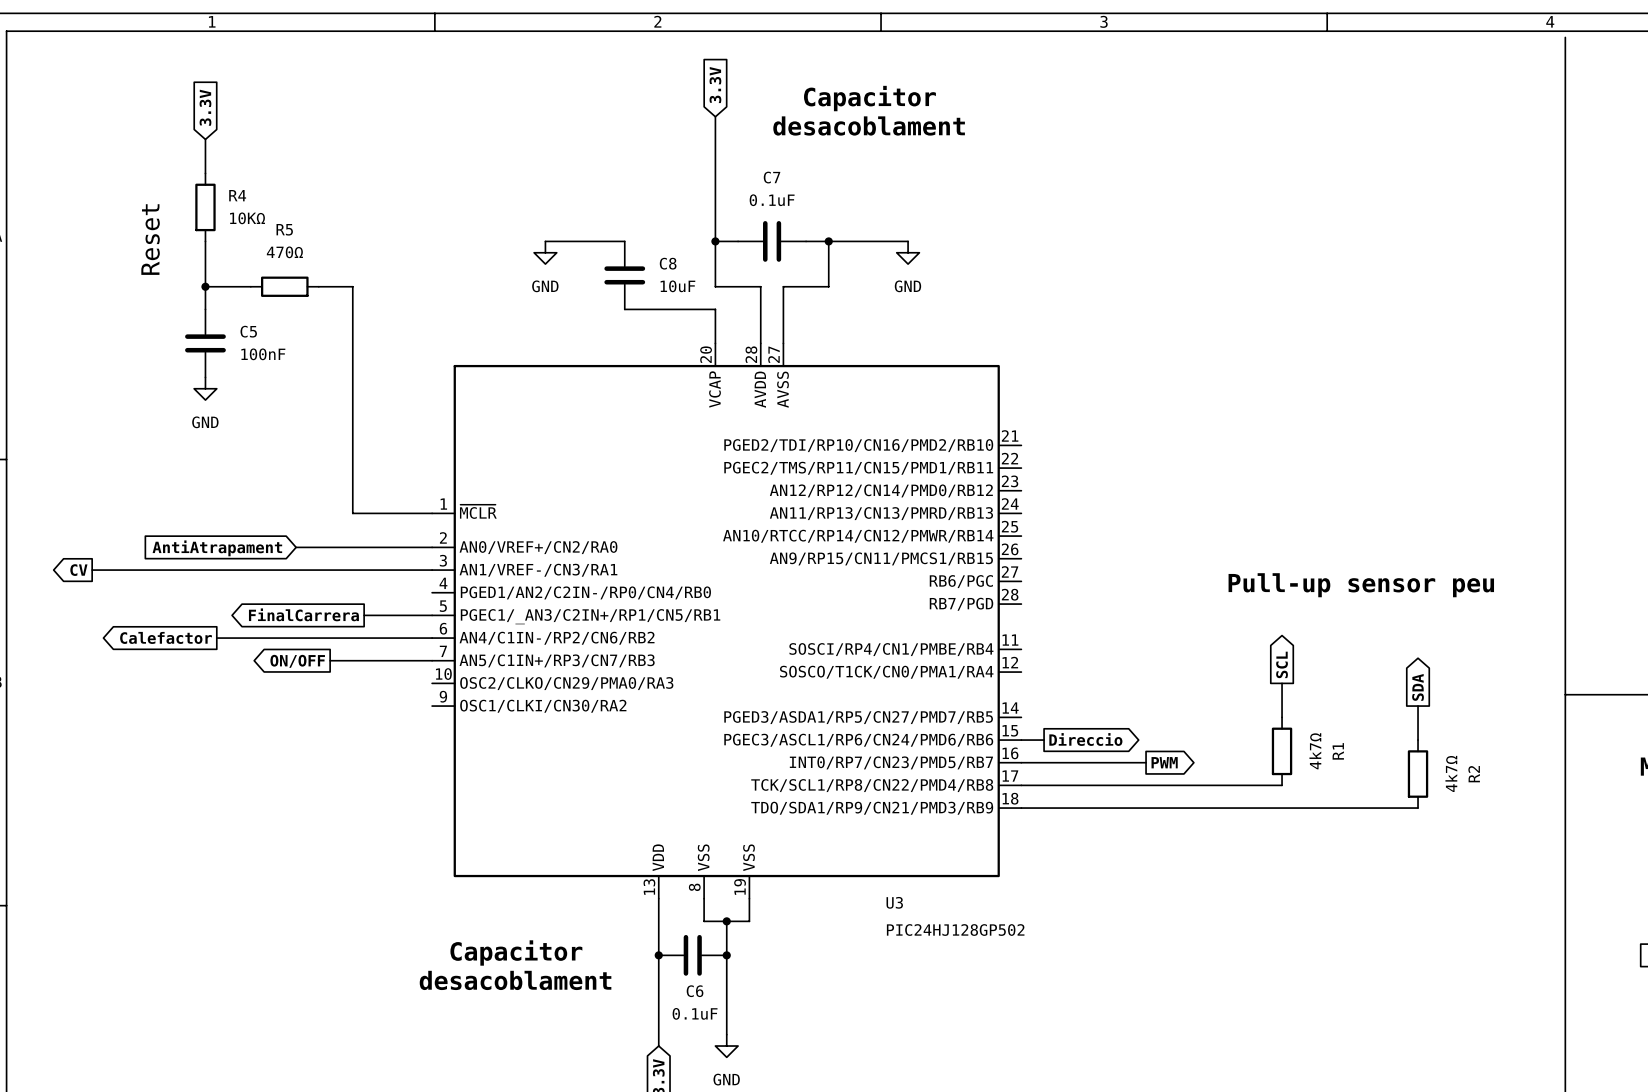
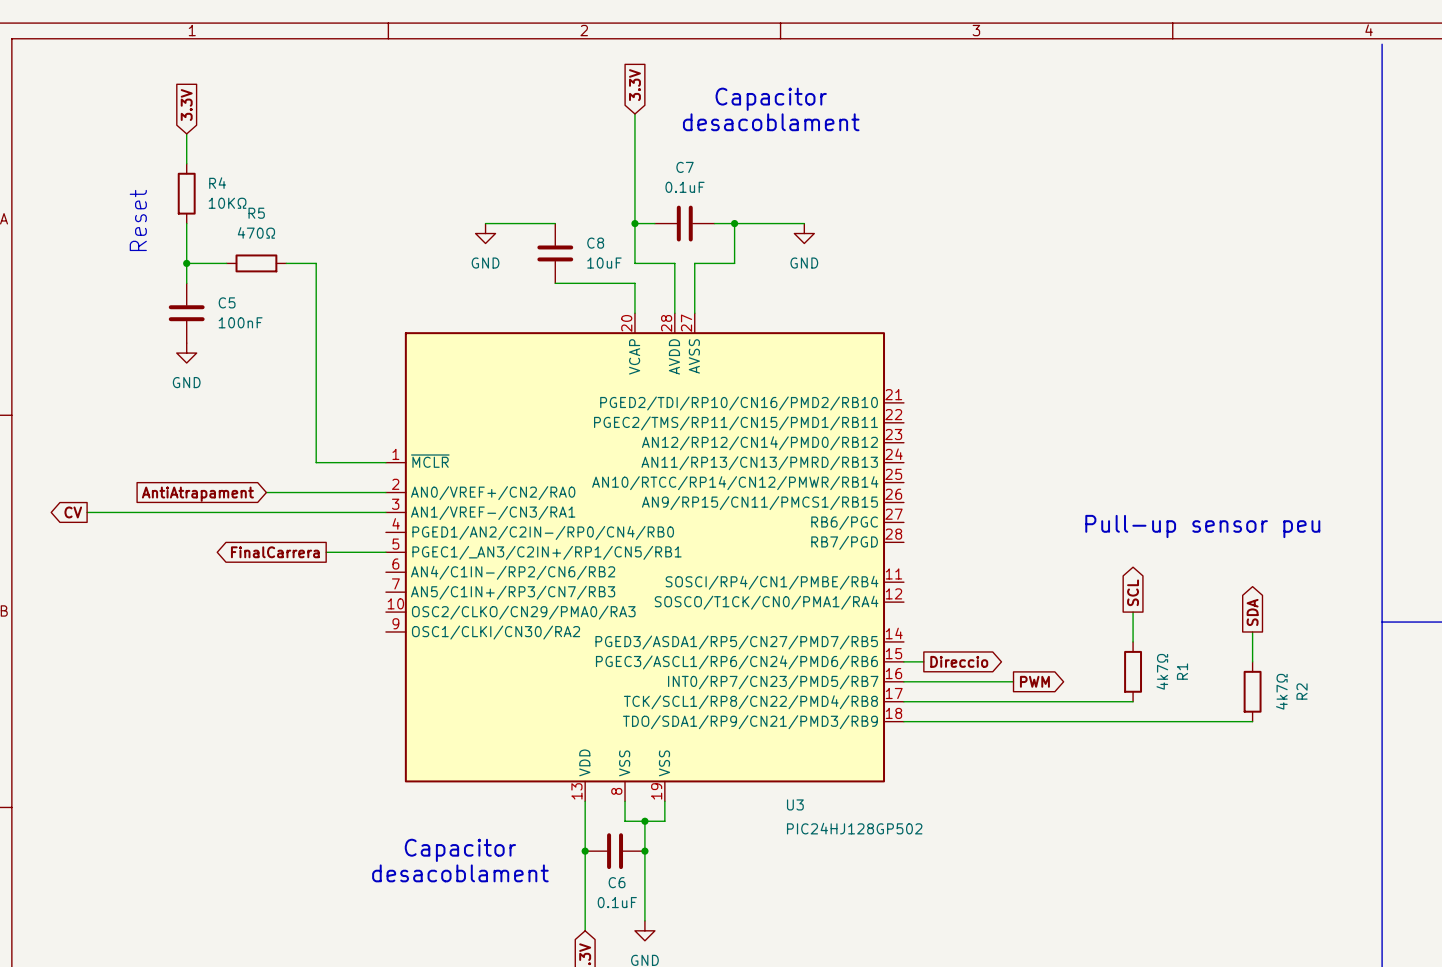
global label: Calefactor (166, 637) -> none
wire: (216, 638) (432, 638) -> none
wire: (330, 660) (432, 660) -> none
global label: ON/OFF (297, 661) -> none

